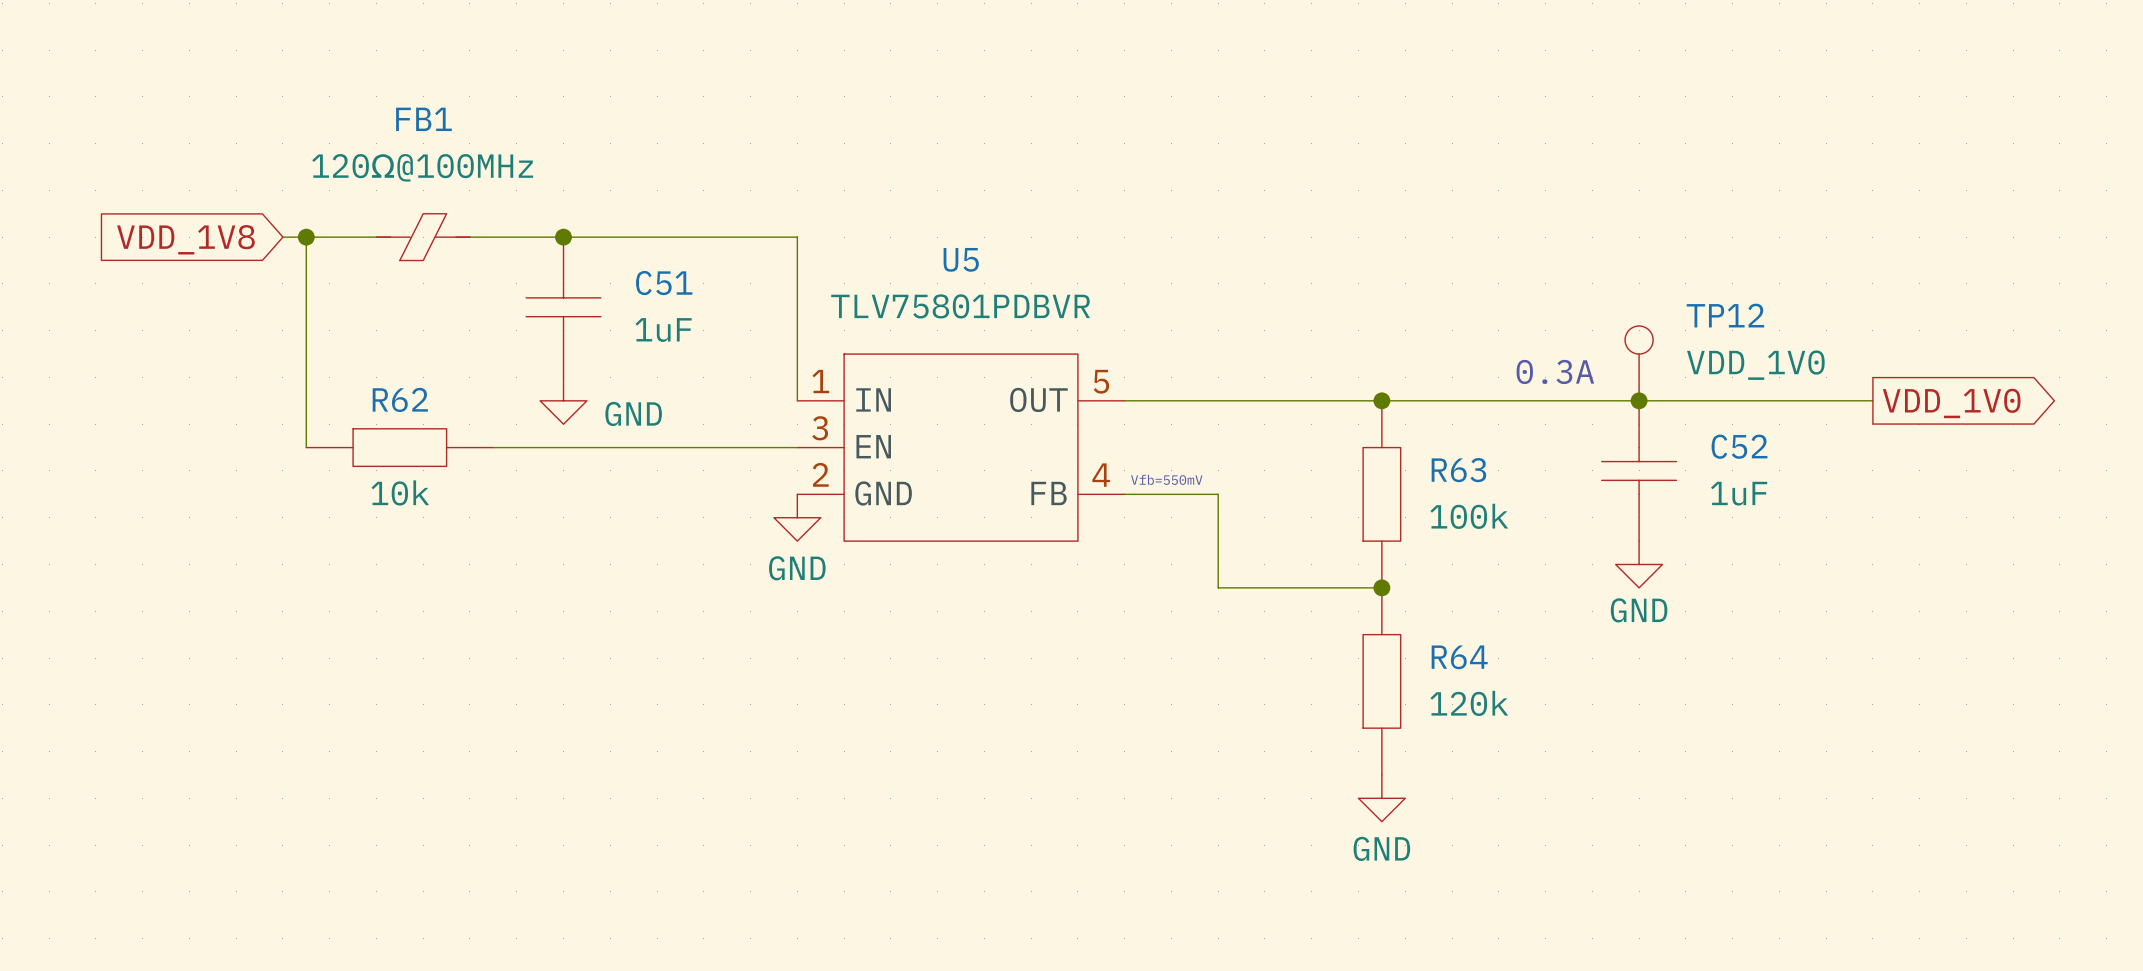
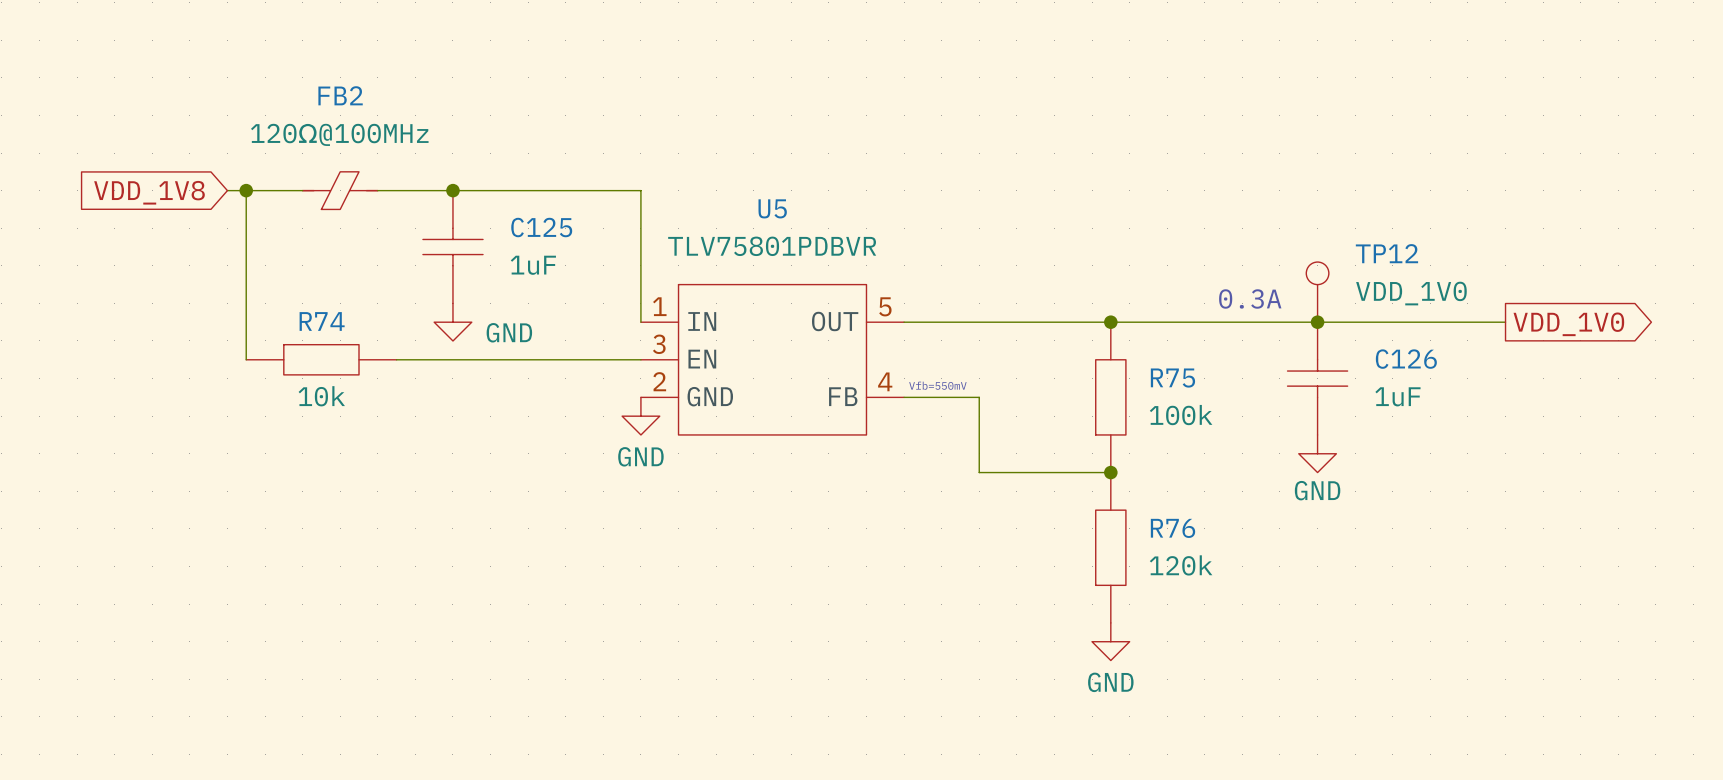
FB1 name: FB1 (423, 119) -> FB2 (340, 95)
C51 name: C51 (664, 283) -> C125 (541, 227)
R62 name: R62 (400, 399) -> R74 (322, 321)
C52 name: C52 (1739, 446) -> C126 (1406, 359)
R63 name: R63 (1458, 470) -> R75 (1172, 378)
R64 name: R64 (1459, 657) -> R76 (1173, 528)

